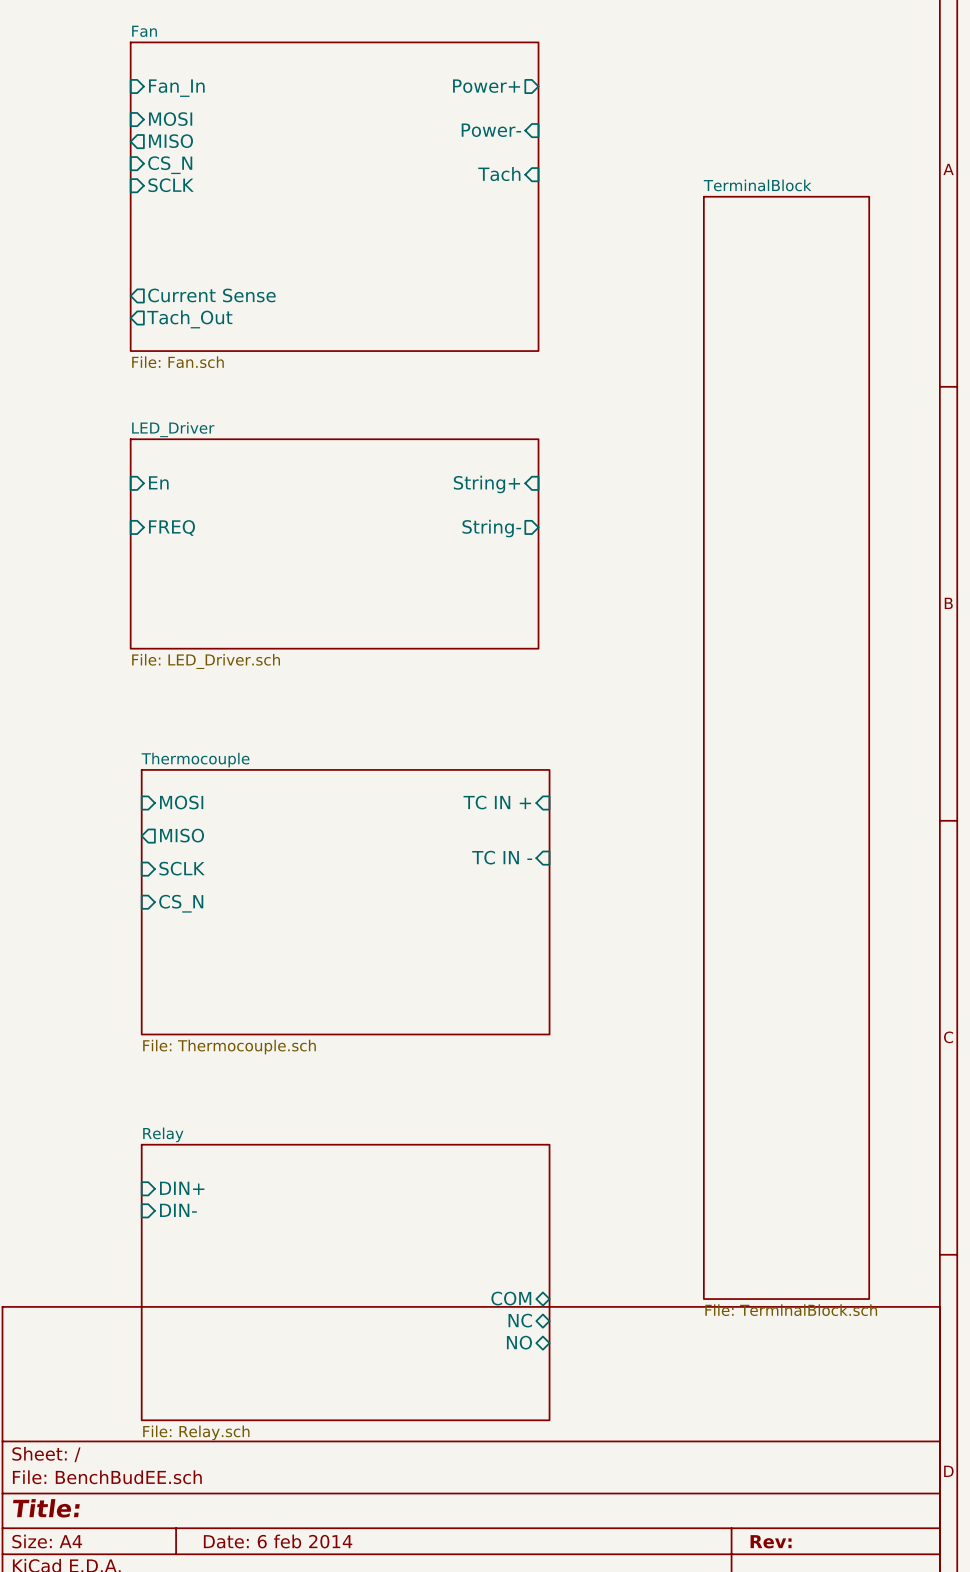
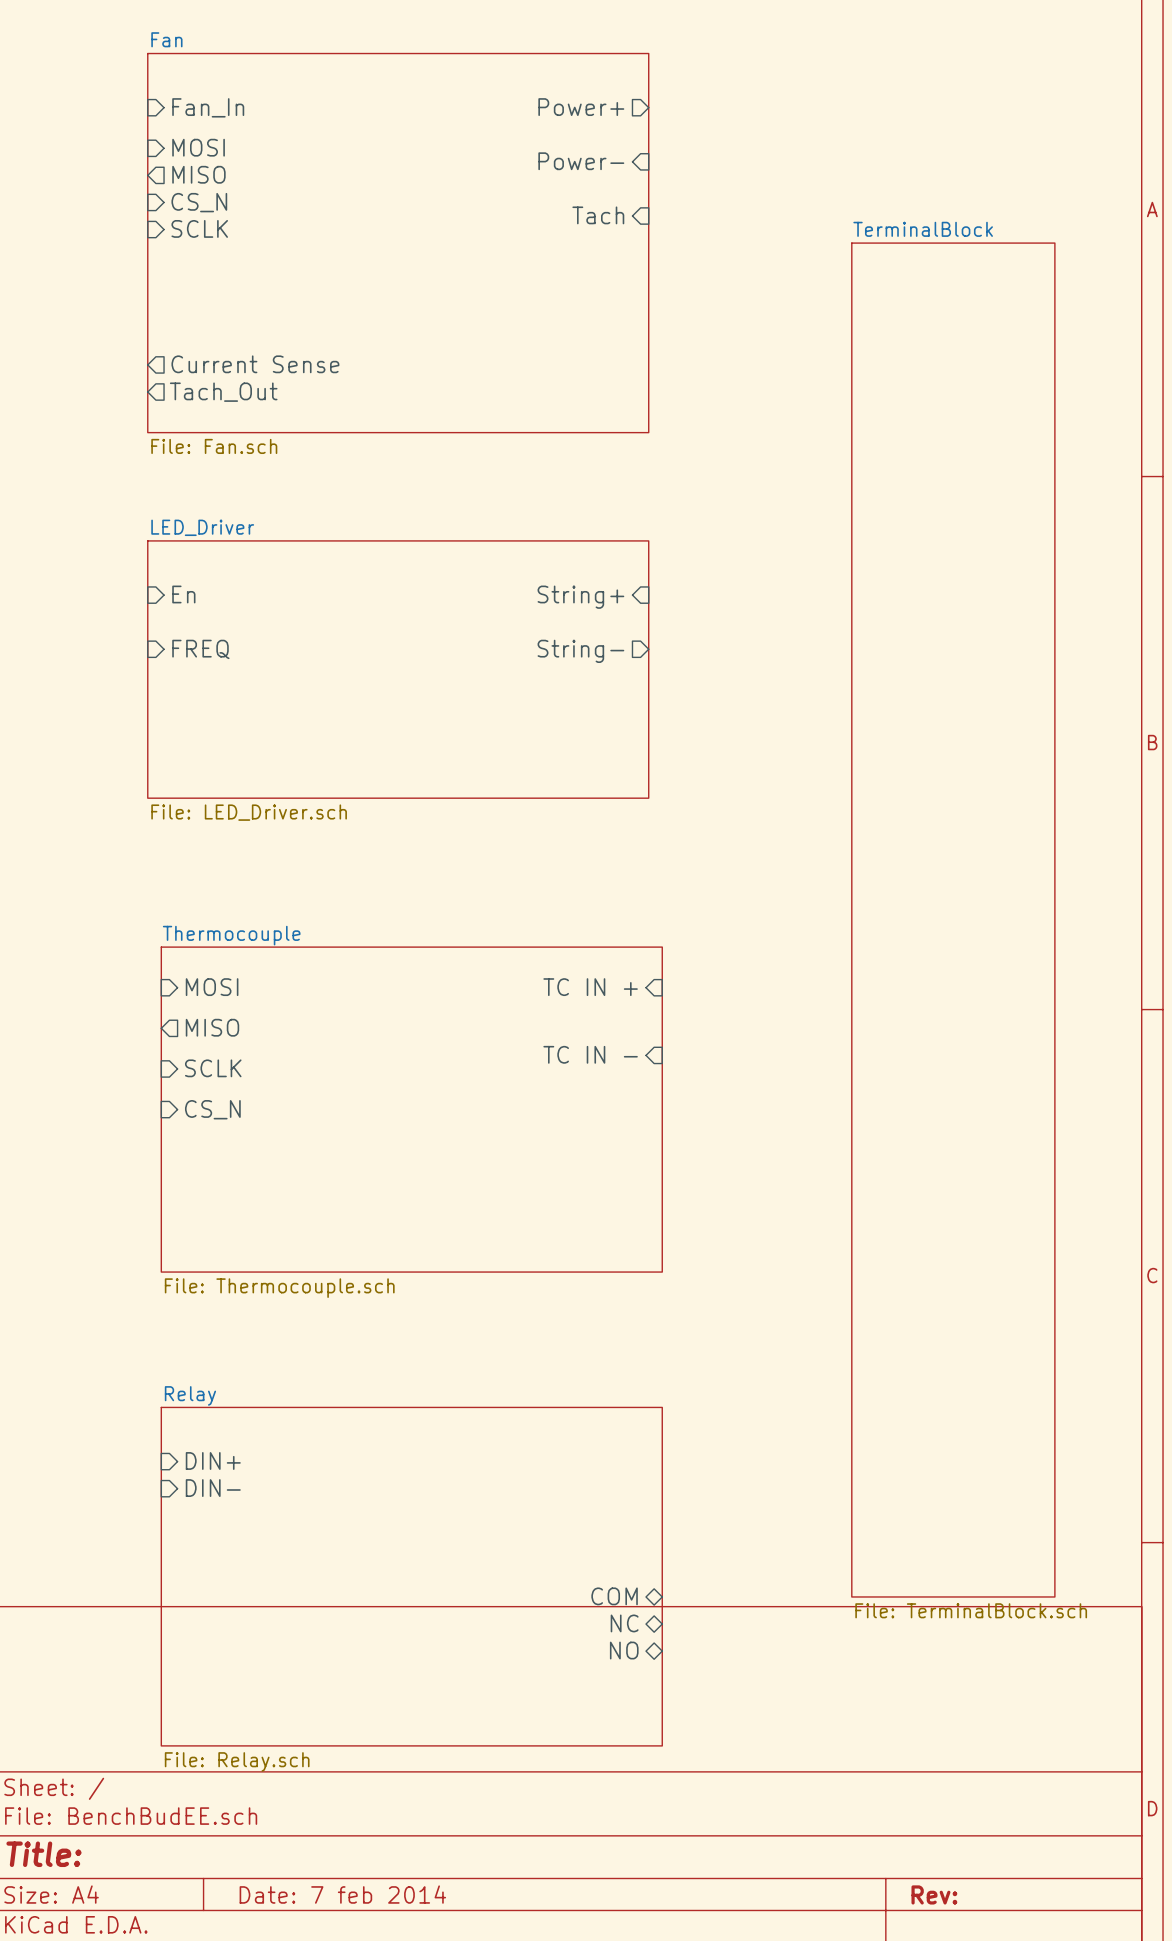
title block: Date: 6 feb 2014 (278, 1541) -> Date: 7 feb 2014 (342, 1894)

